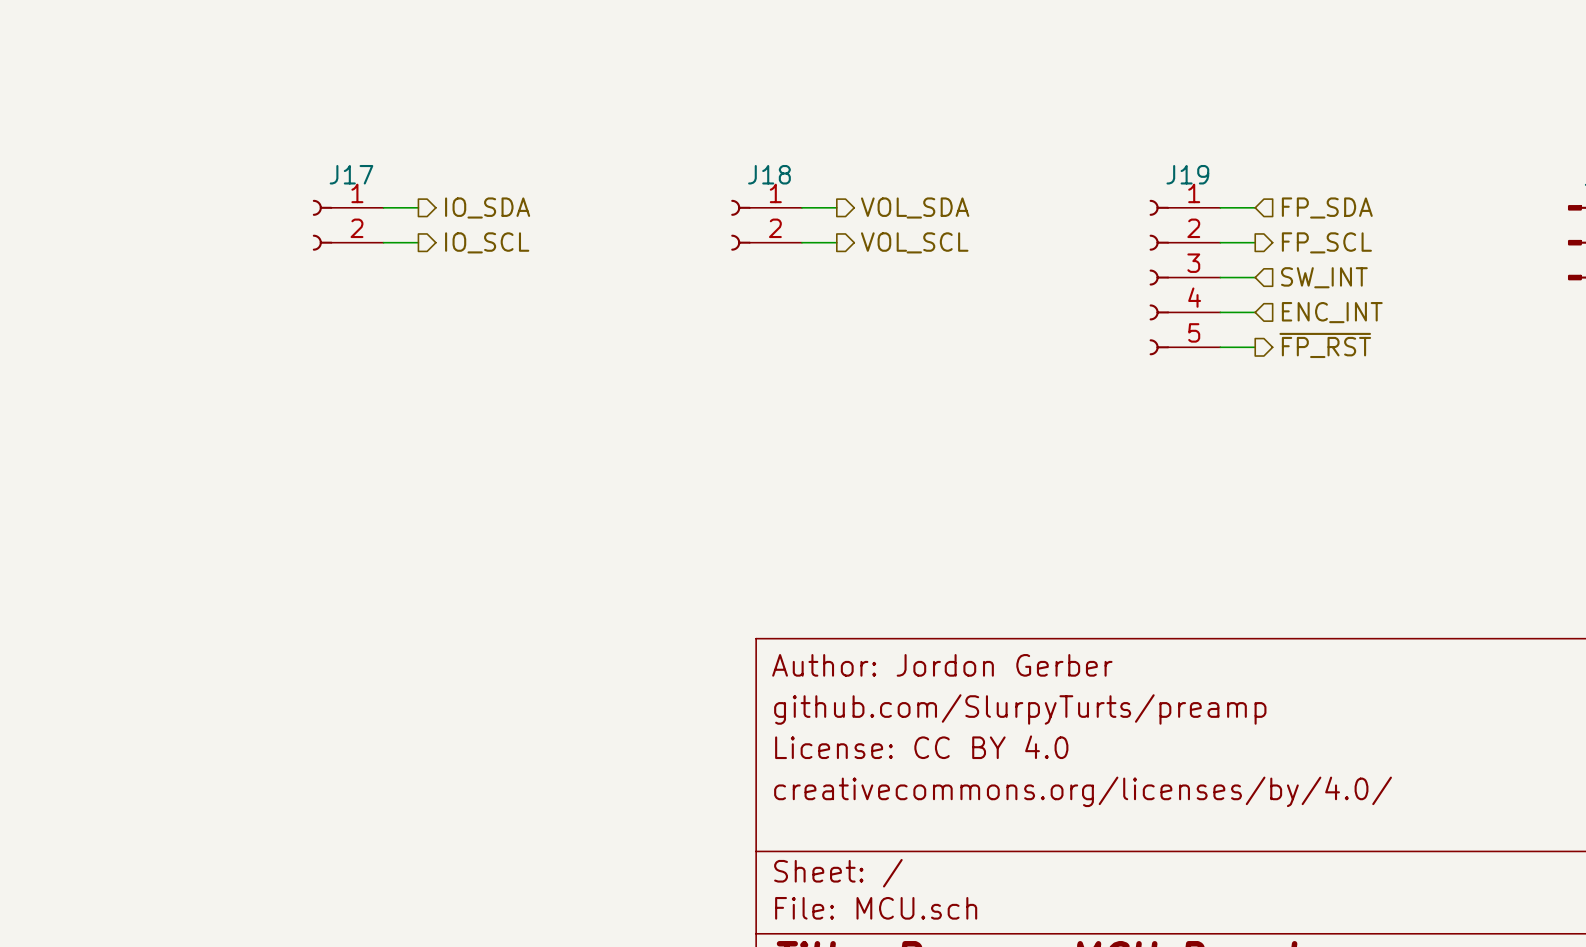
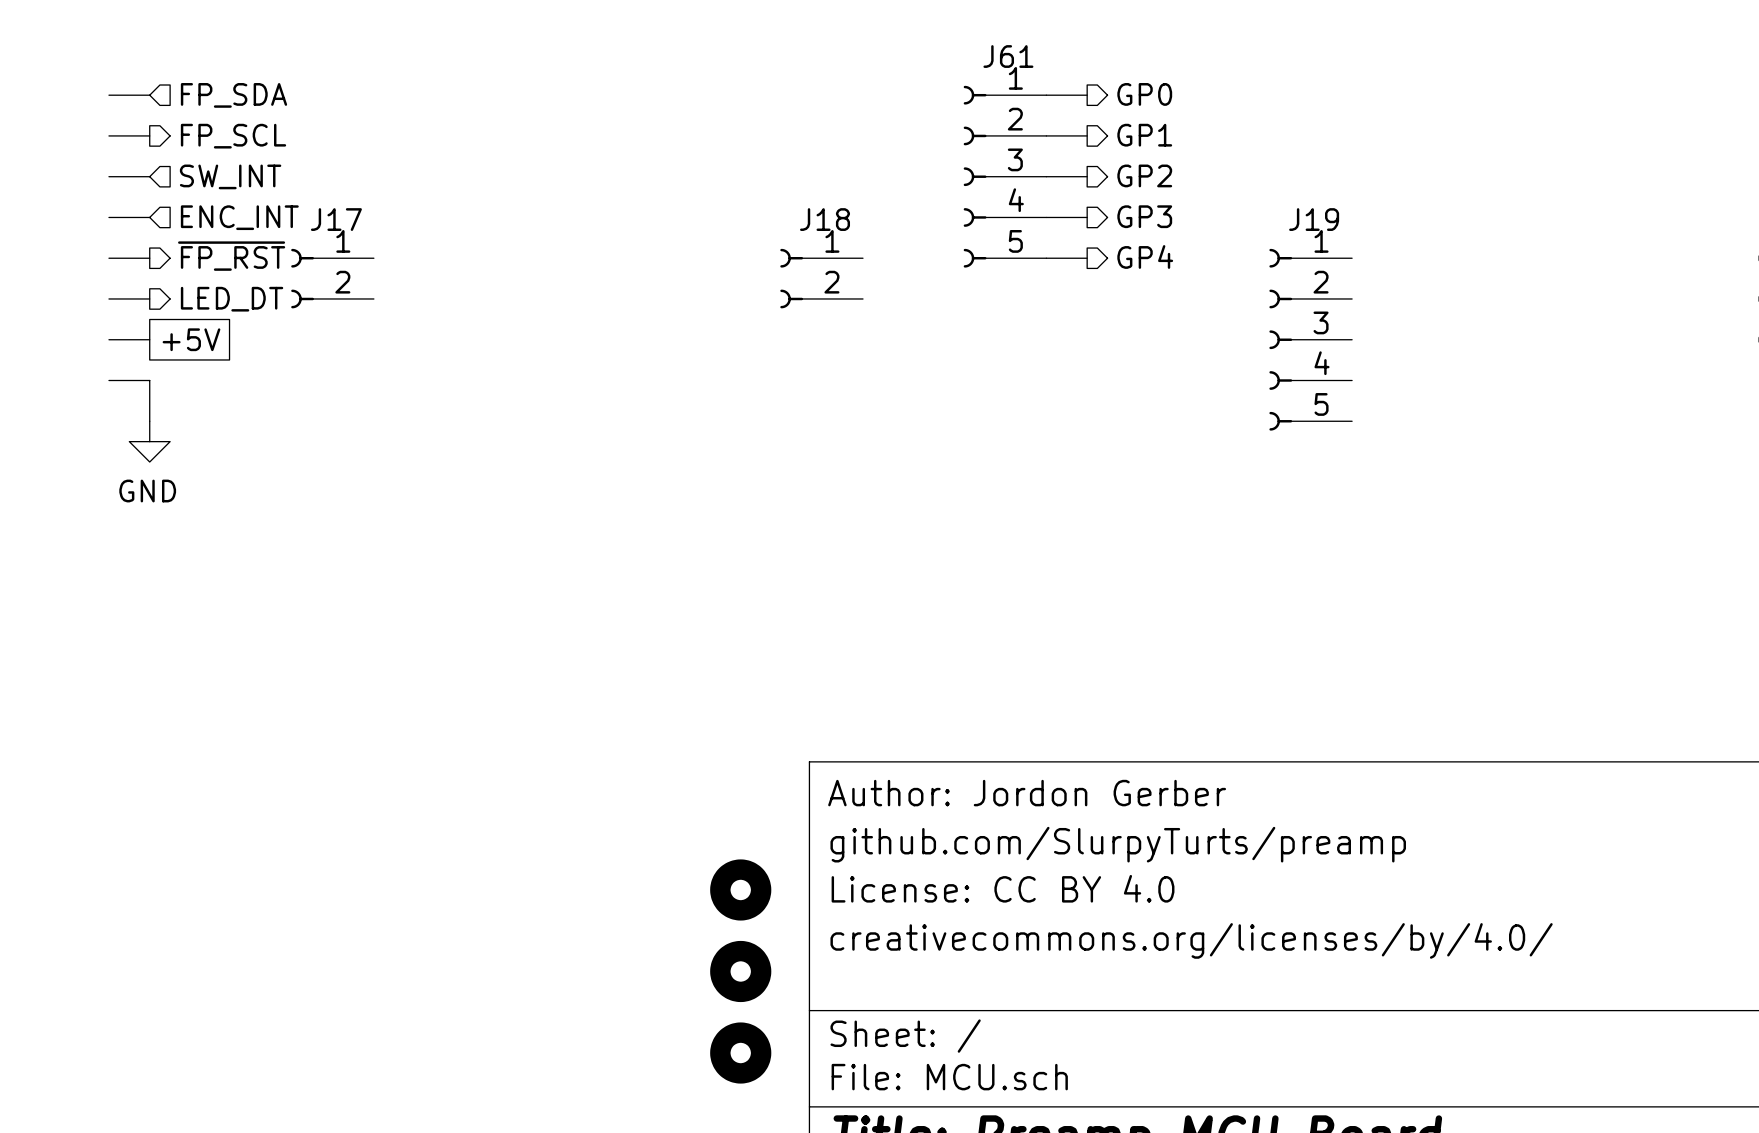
hierarchical label: none -> GP0 (1144, 94)
wire: none -> (108, 95) (149, 95)
hierarchical label: none -> FP_SDA (233, 95)
hierarchical label: none -> GP1 (1144, 135)
wire: none -> (108, 135) (149, 135)
hierarchical label: none -> FP_SCL (233, 136)
hierarchical label: none -> GP2 (1144, 175)
wire: none -> (108, 176) (149, 176)
hierarchical label: none -> SW_INT (230, 176)
J61: none -> (1005, 176)
wire: none -> (108, 217) (149, 217)
hierarchical label: none -> GP3 (1144, 216)
hierarchical label: none -> ENC_INT (239, 217)
hierarchical label: none -> ~{FP_RST} (231, 256)
hierarchical label: none -> GP4 (1145, 256)
wire: (383, 207) (418, 207) -> (108, 258) (149, 258)
wire: (801, 207) (836, 207) -> none
wire: (1220, 207) (1255, 207) -> (1046, 95) (1087, 95)
hierarchical label: IO_SDA (487, 208) -> none
hierarchical label: VOL_SDA (915, 208) -> none
hierarchical label: FP_SDA (1327, 208) -> none
hierarchical label: none -> LED_DT (232, 299)
wire: (383, 242) (418, 242) -> (108, 298) (149, 298)
hierarchical label: IO_SCL (487, 242) -> none
wire: (801, 242) (836, 242) -> none
hierarchical label: VOL_SCL (914, 242) -> none
wire: (1220, 242) (1255, 242) -> (1046, 135) (1087, 135)
hierarchical label: FP_SCL (1326, 242) -> none
wire: none -> (108, 339) (149, 339)
global label: none -> +5V (191, 339)
wire: (1220, 277) (1255, 277) -> (1046, 176) (1087, 176)
hierarchical label: SW_INT (1324, 277) -> none
wire: none -> (108, 380) (149, 380) (149, 421)
wire: (1220, 312) (1255, 312) -> (1046, 217) (1087, 217)
hierarchical label: ENC_INT (1332, 312) -> none
hierarchical label: ~{FP_RST} (1325, 345) -> none
wire: (1220, 347) (1255, 347) -> (1046, 258) (1087, 258)
power symbol: none -> GND (149, 441)
part: none -> (740, 889)
part: none -> (740, 971)
part: none -> (740, 1053)

